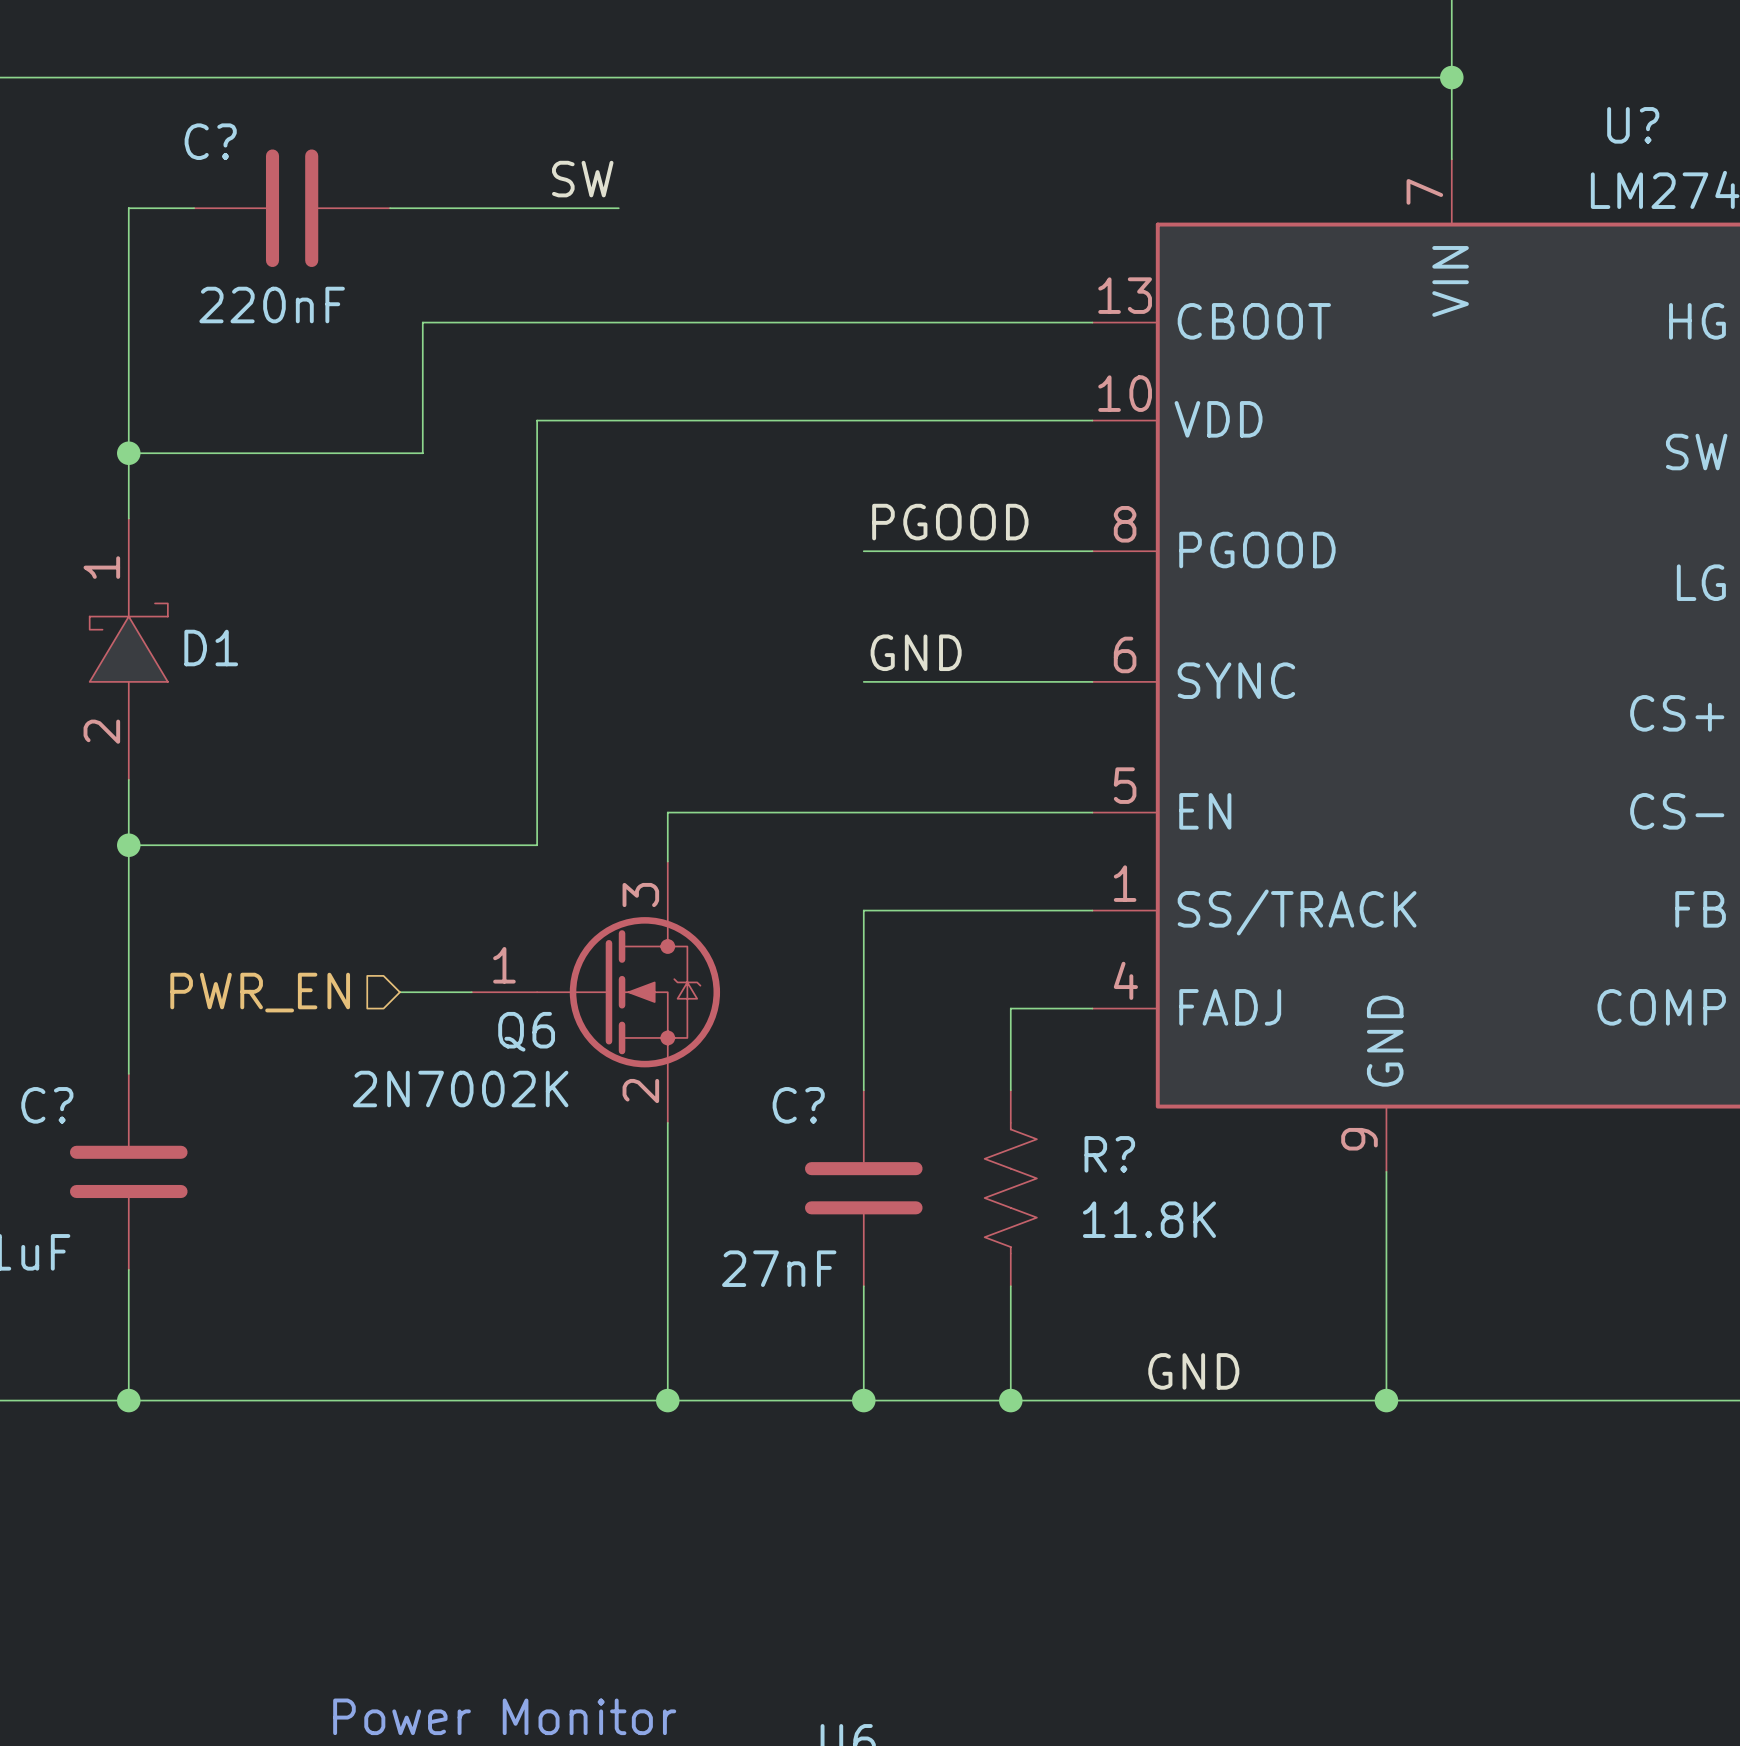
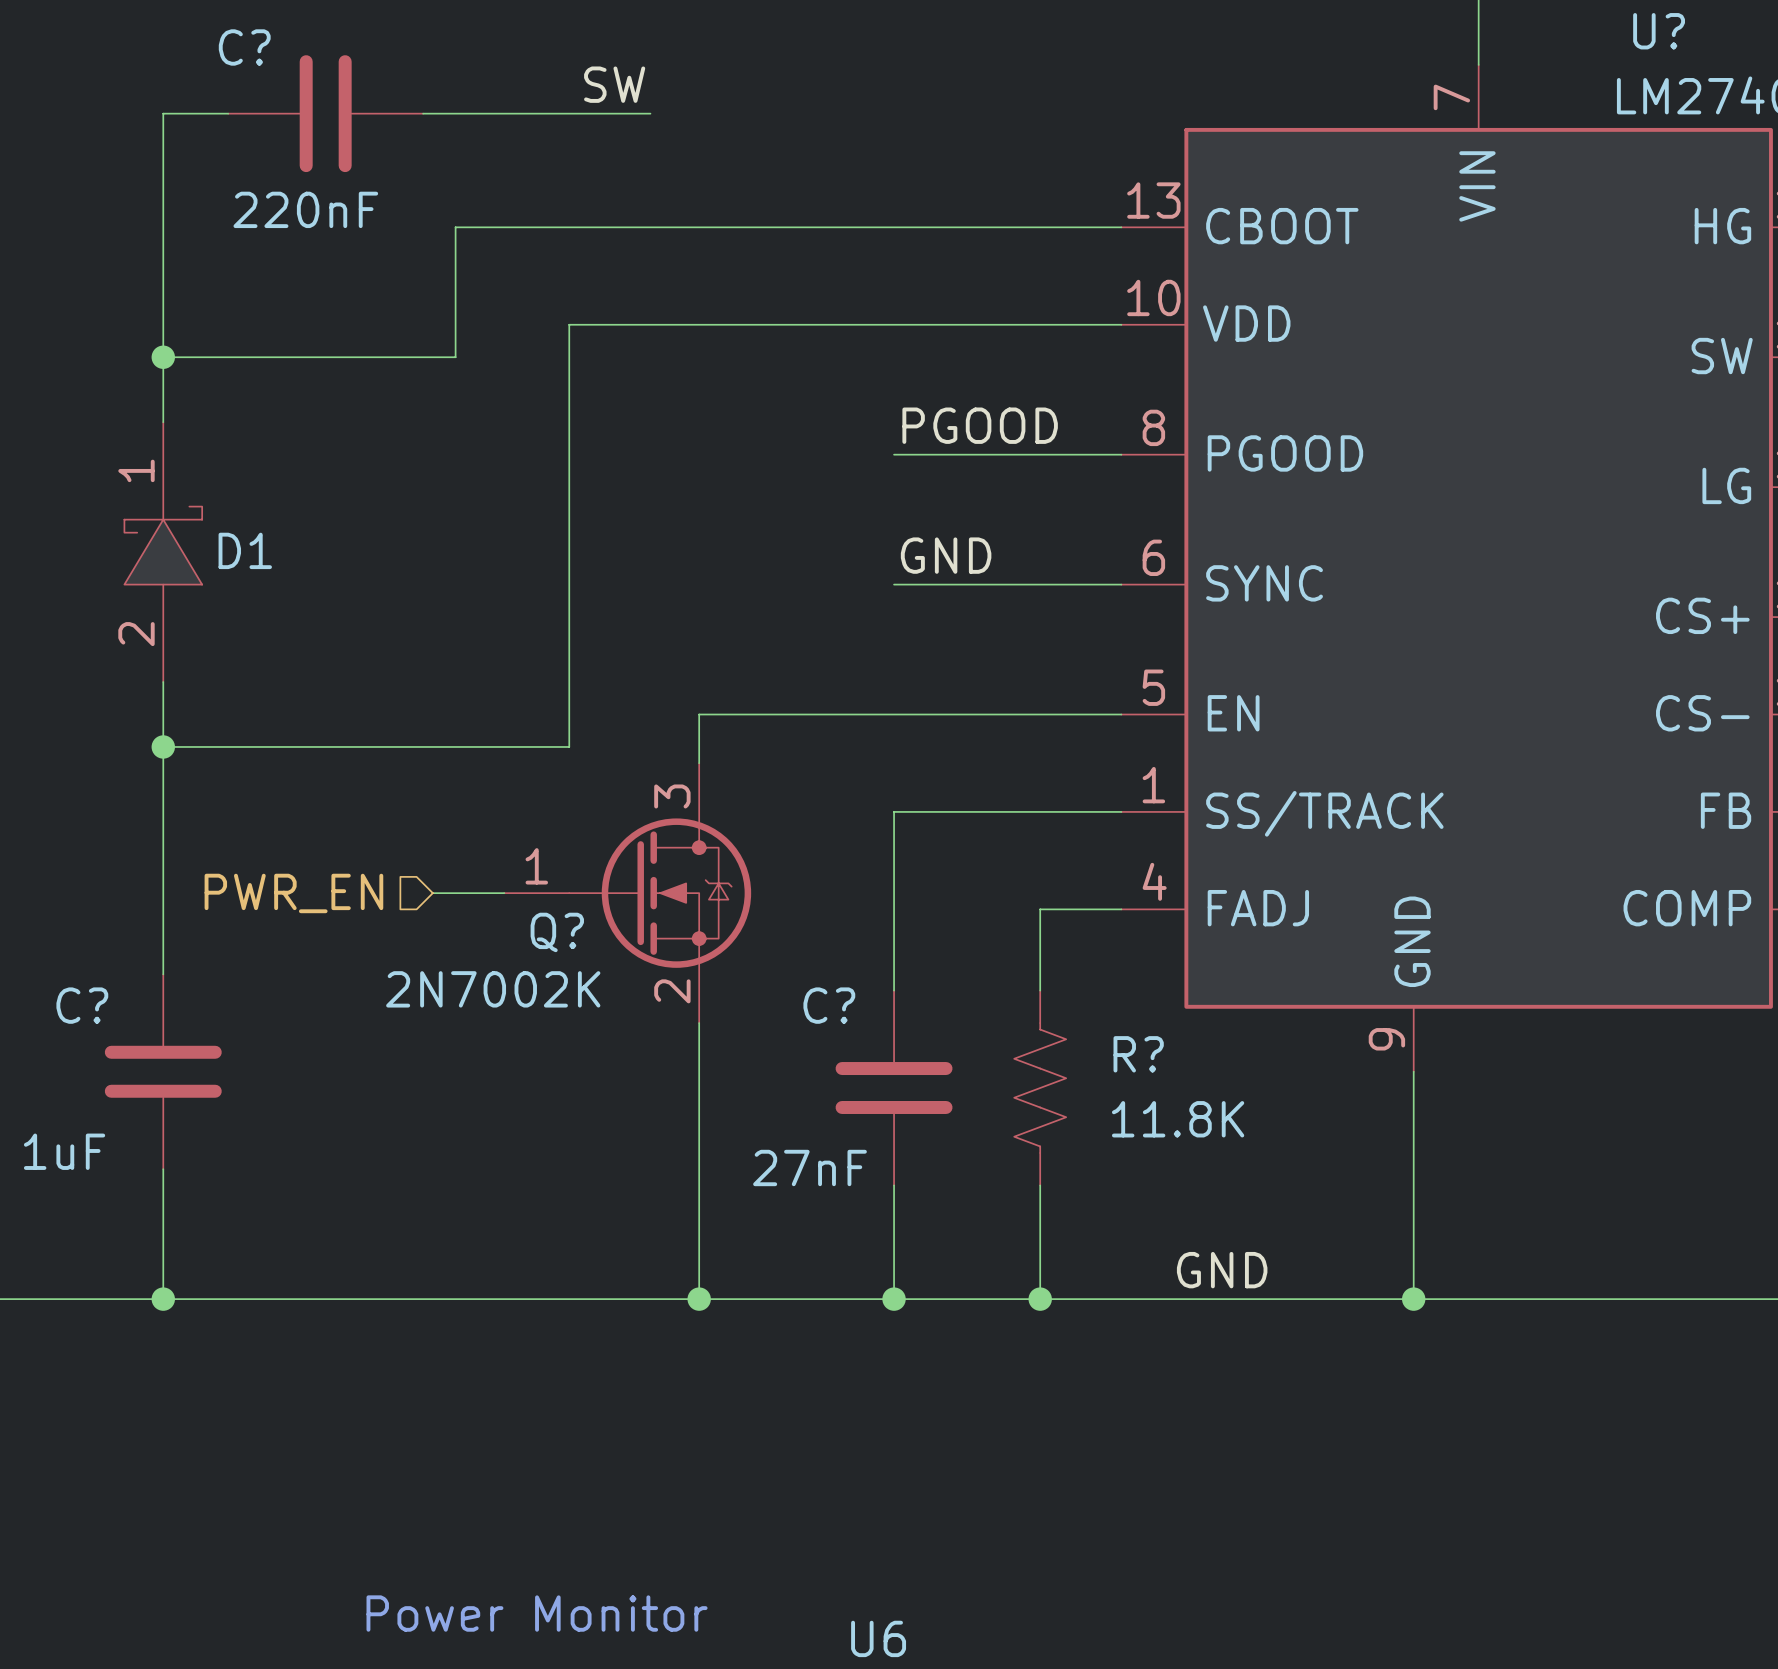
Q6 name: Q6 (526, 1031) -> Q? (557, 932)

